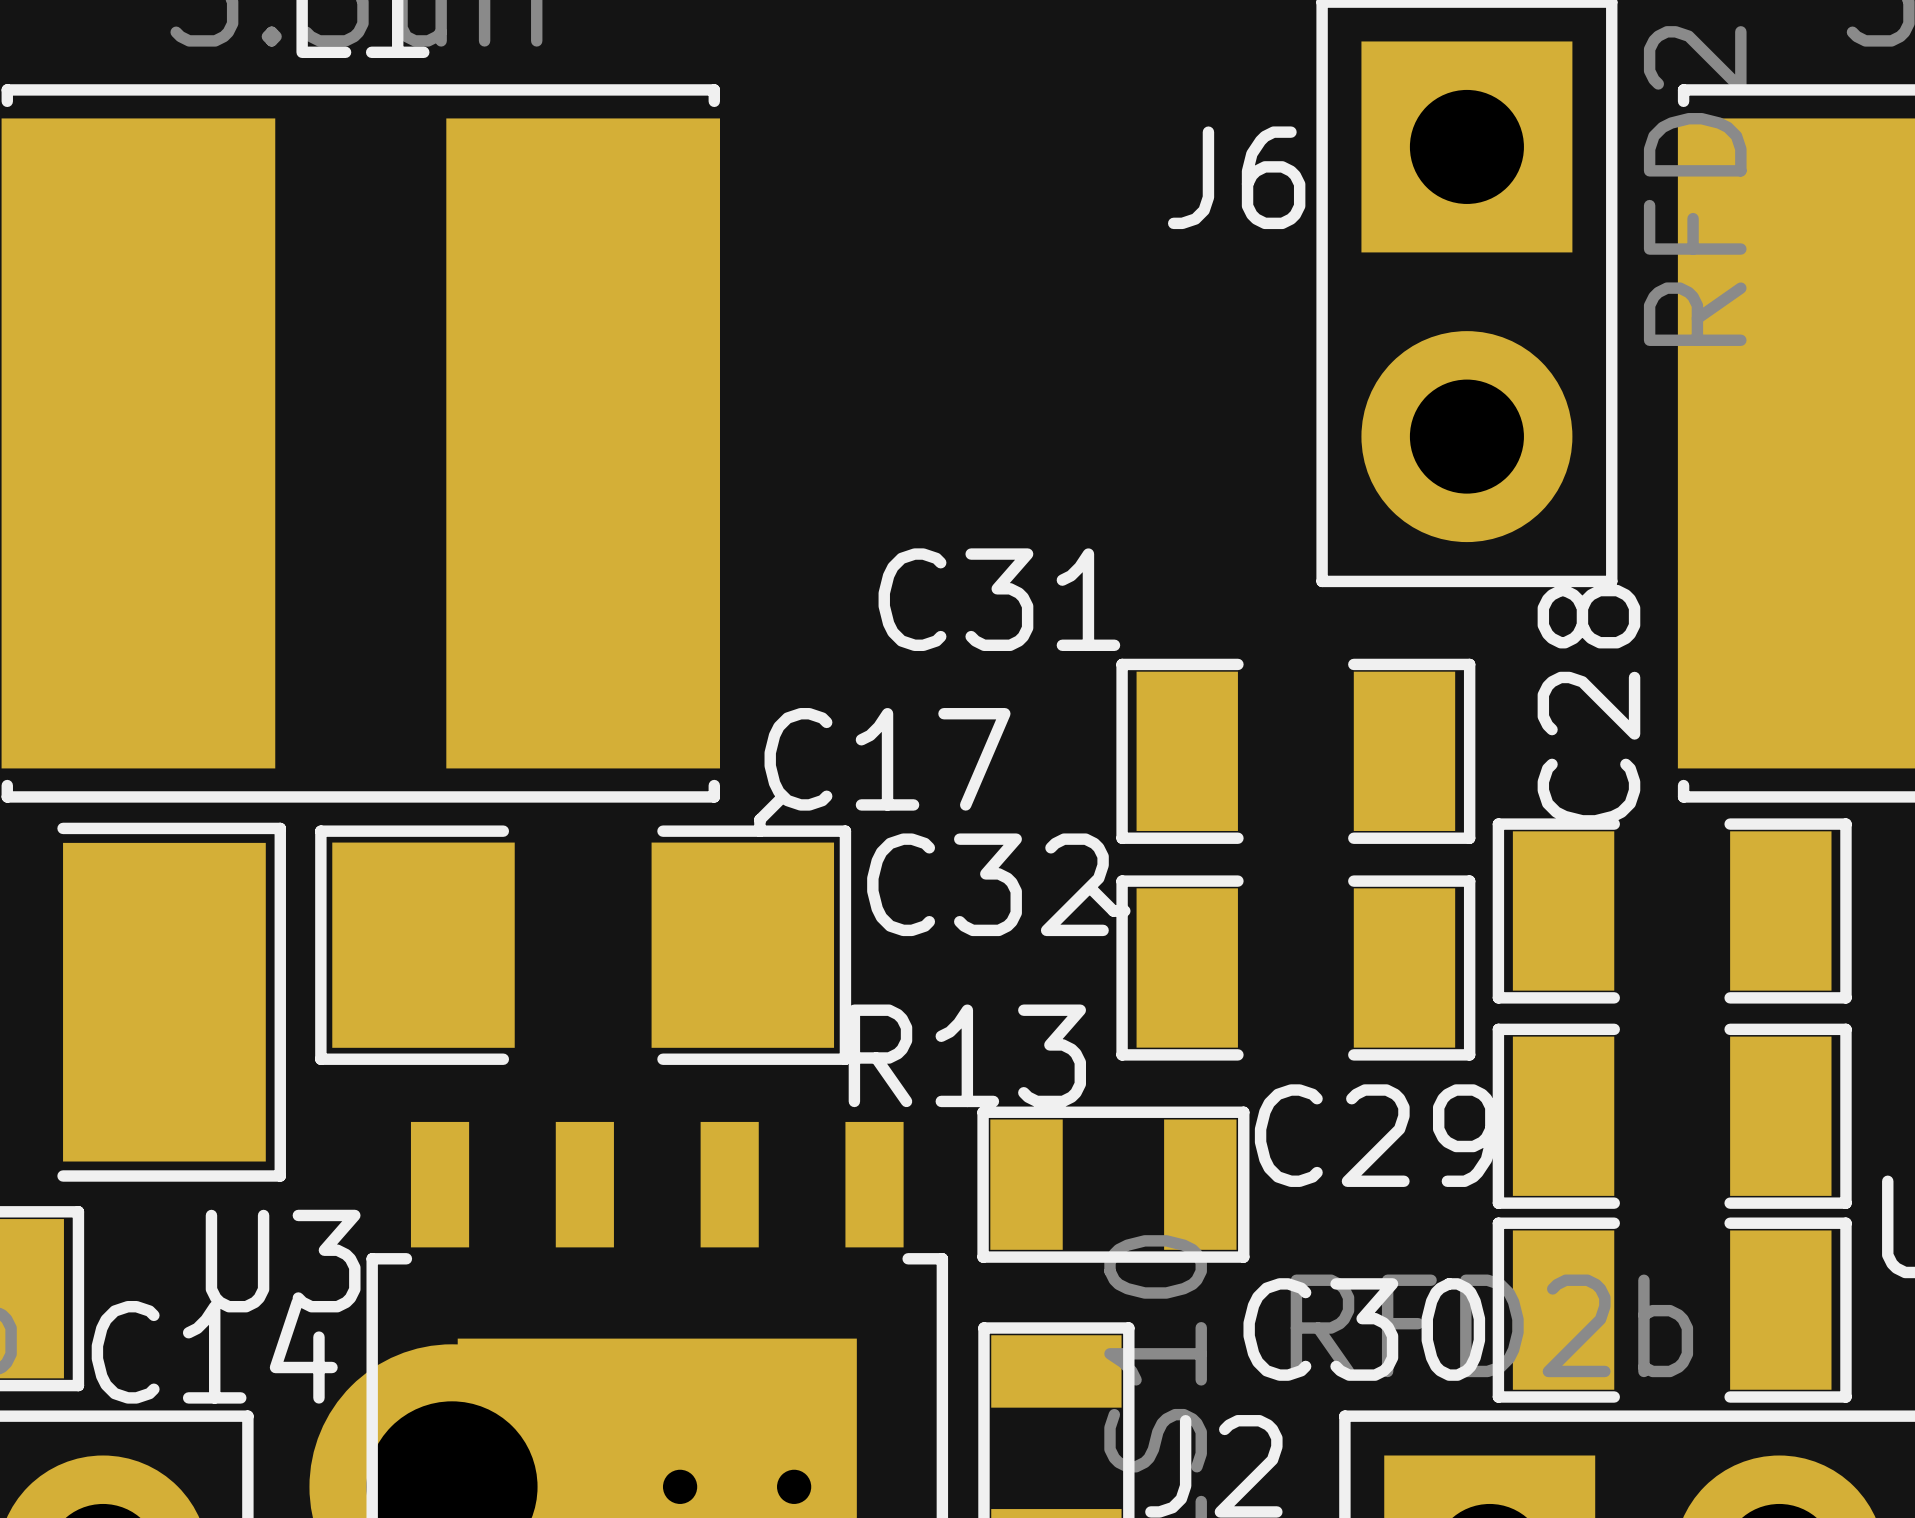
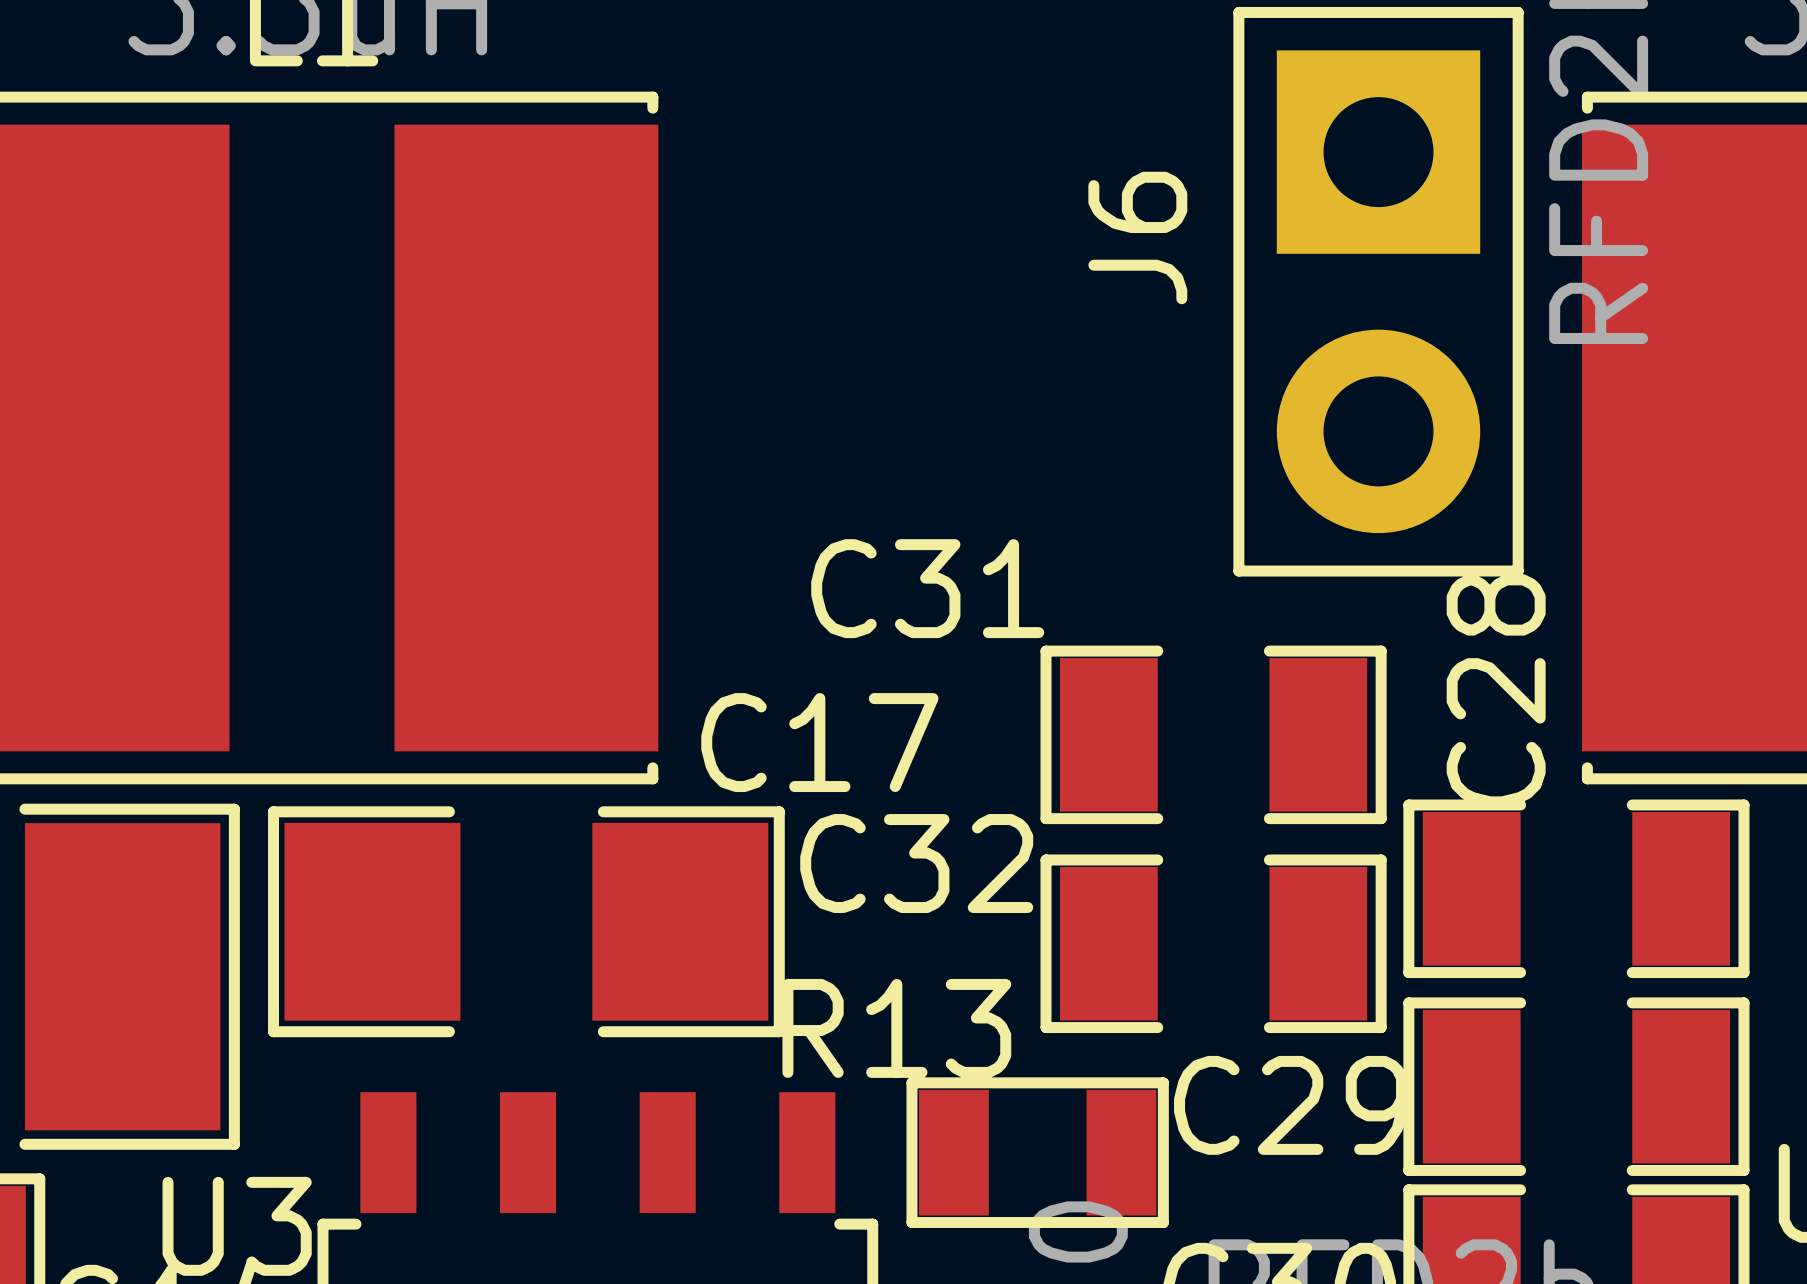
J6 name rotation: 0° (1236, 177) -> 90° counterclockwise (1137, 237)
line: (782, 796) (759, 819) (759, 831) -> none
line: (1090, 888) (1113, 910) (1124, 910) -> none

